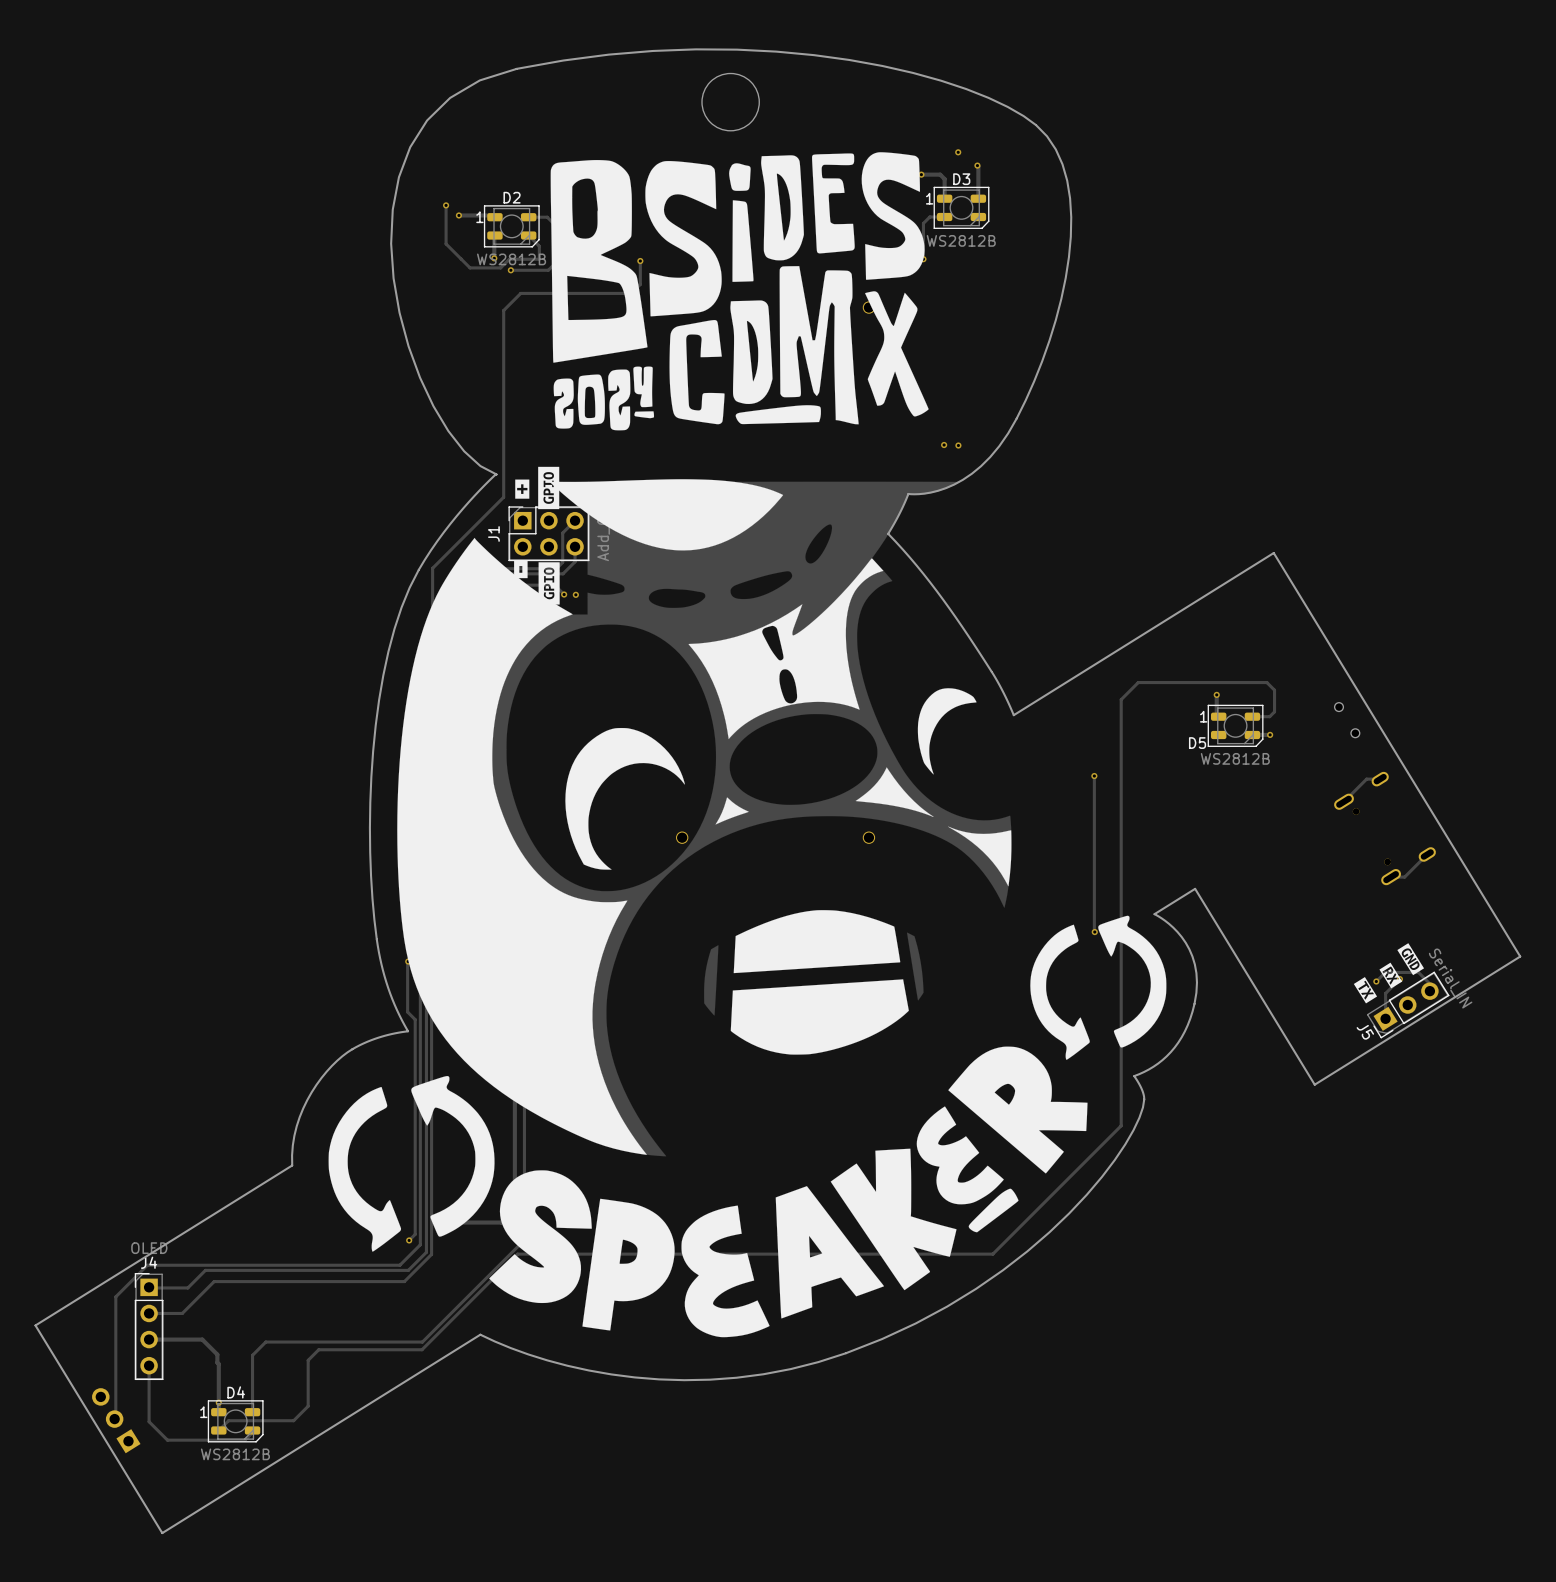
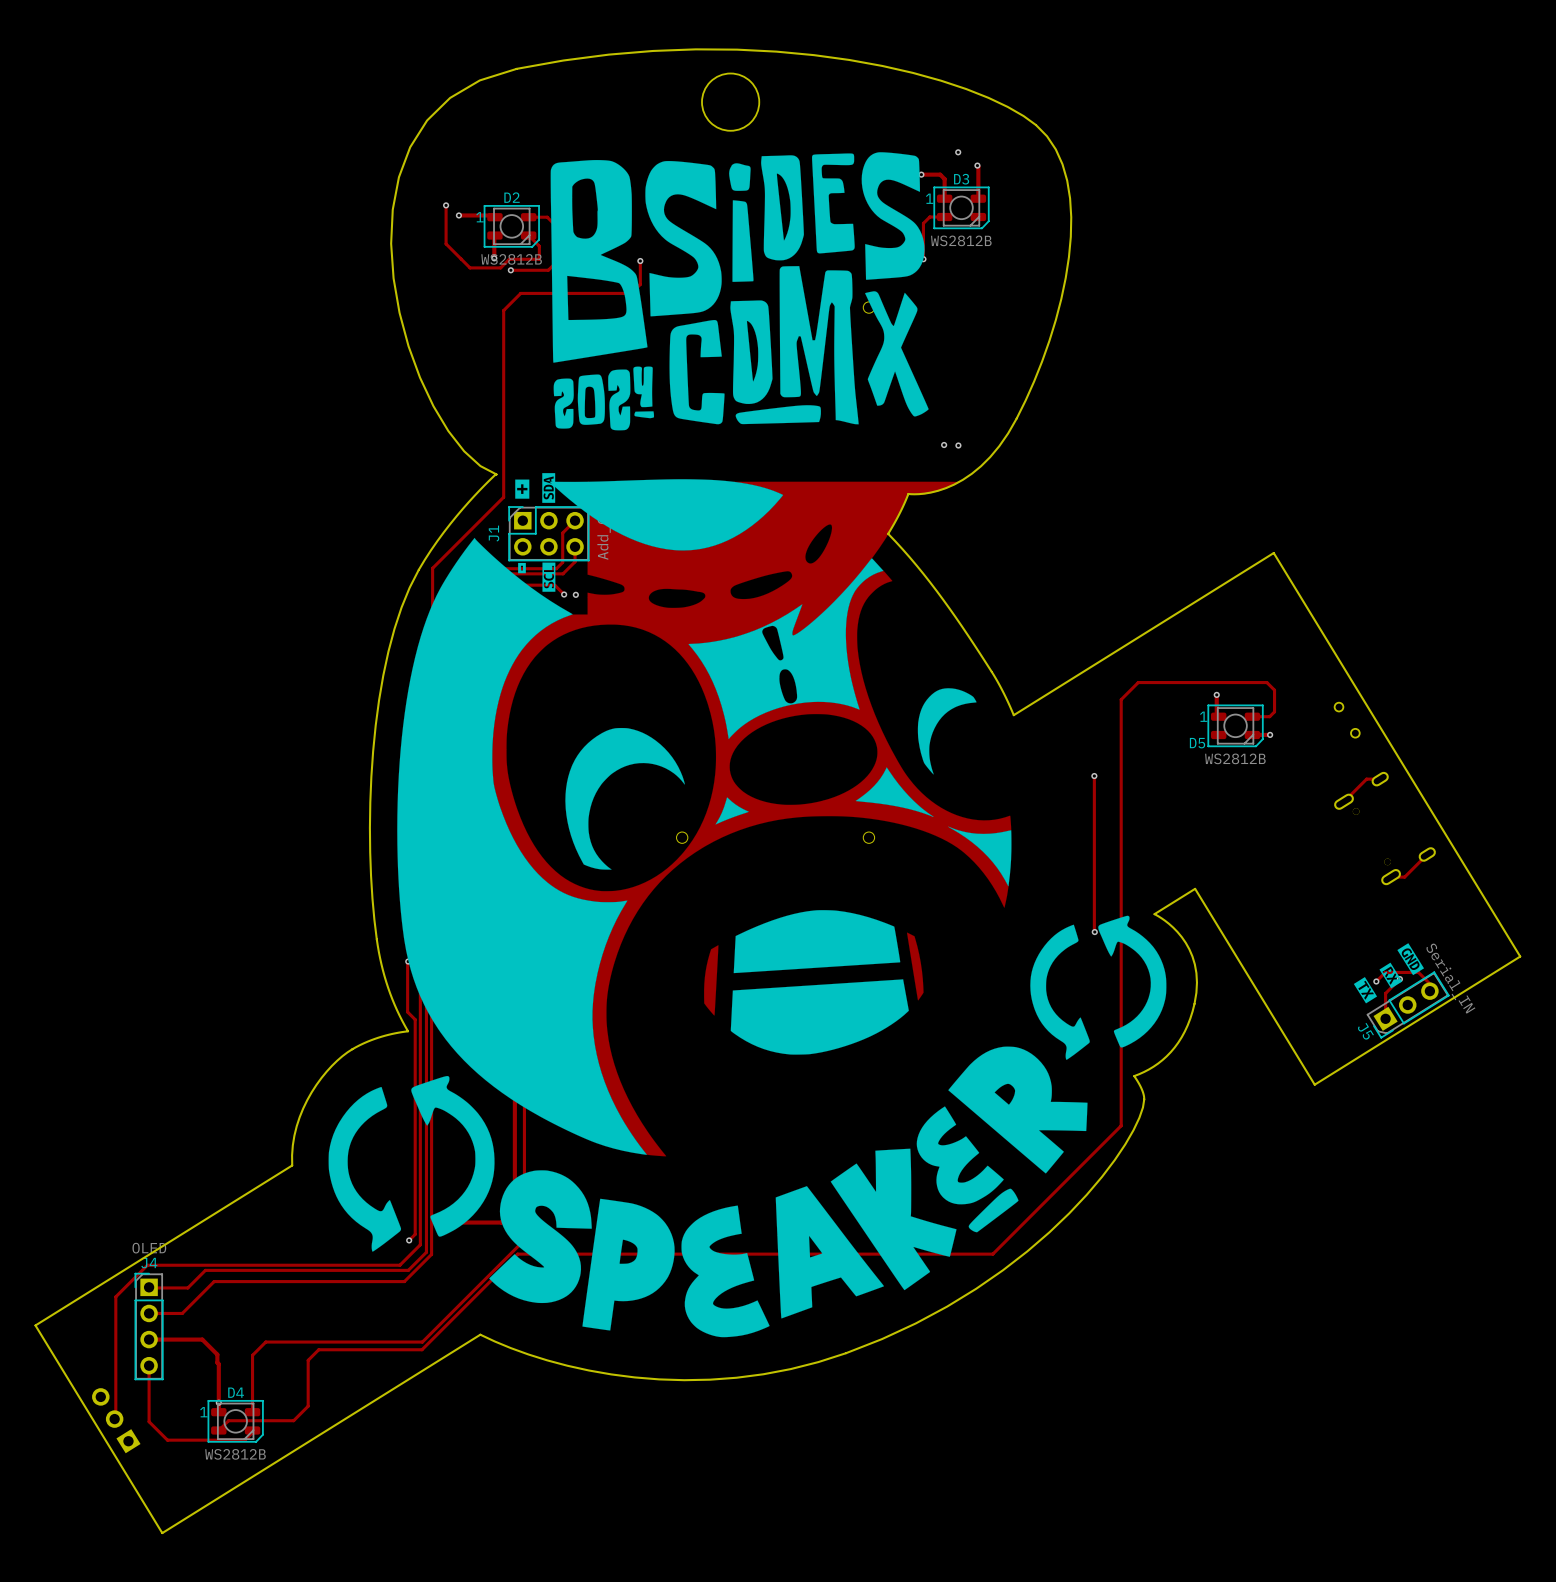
drawing shape: [538, 466, 560, 510] -> [542, 473, 556, 503]
drawing shape: [514, 560, 528, 579] -> [518, 562, 526, 574]
drawing shape: [538, 562, 560, 605] -> [542, 562, 556, 592]

